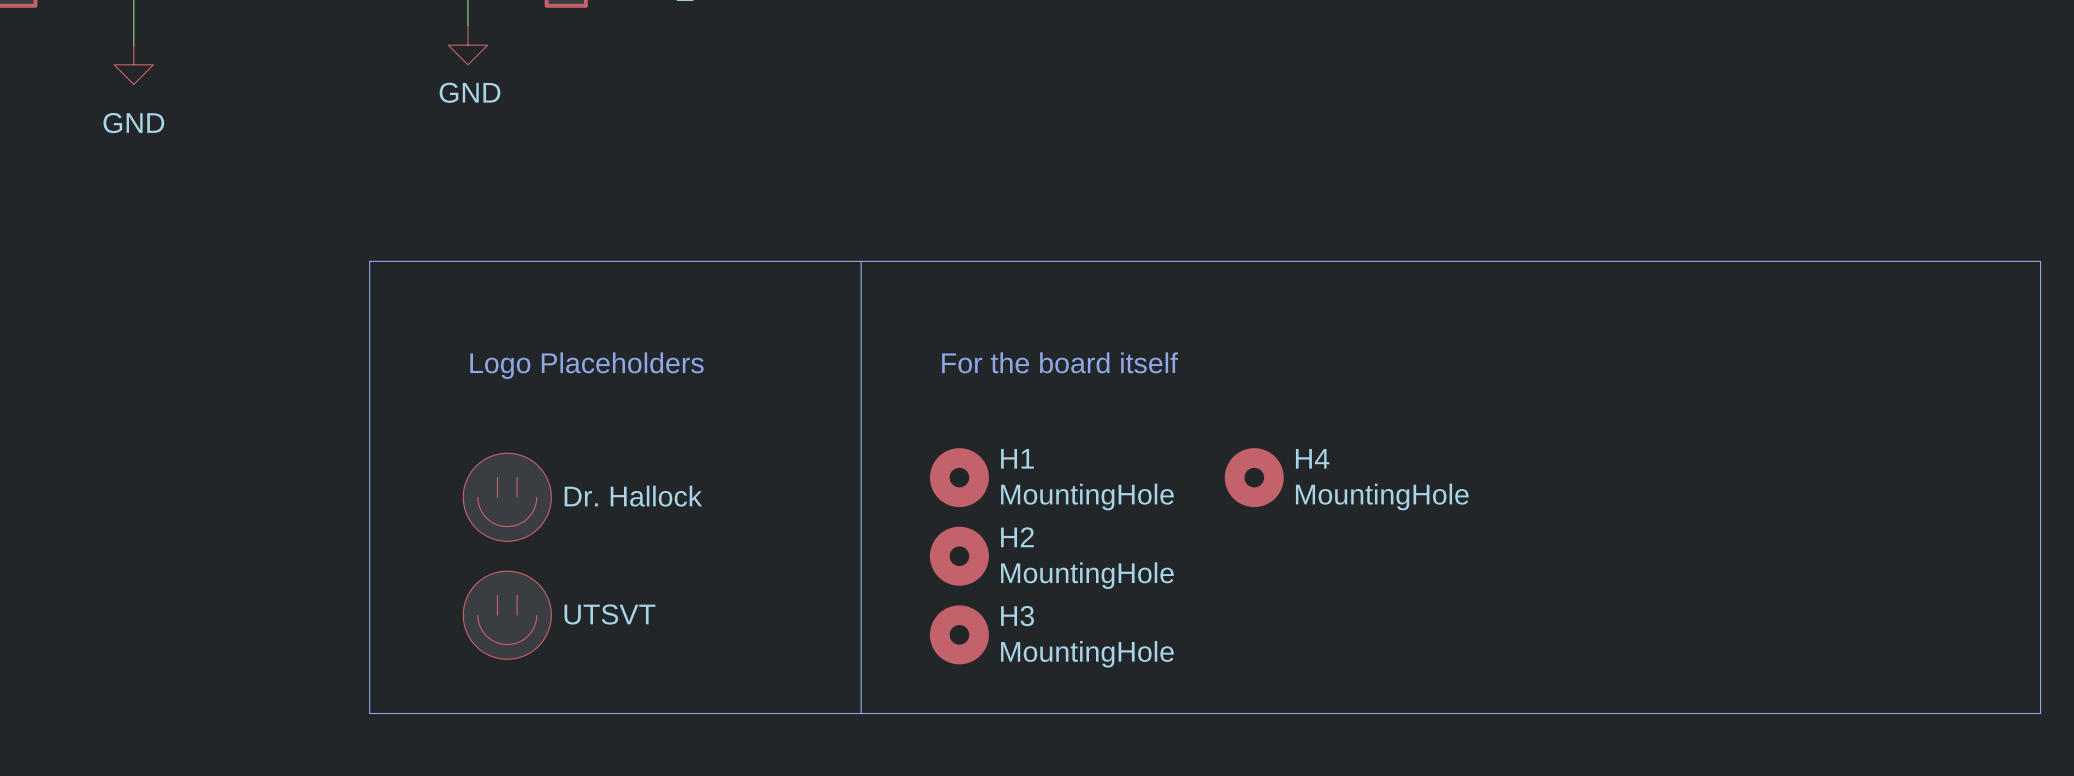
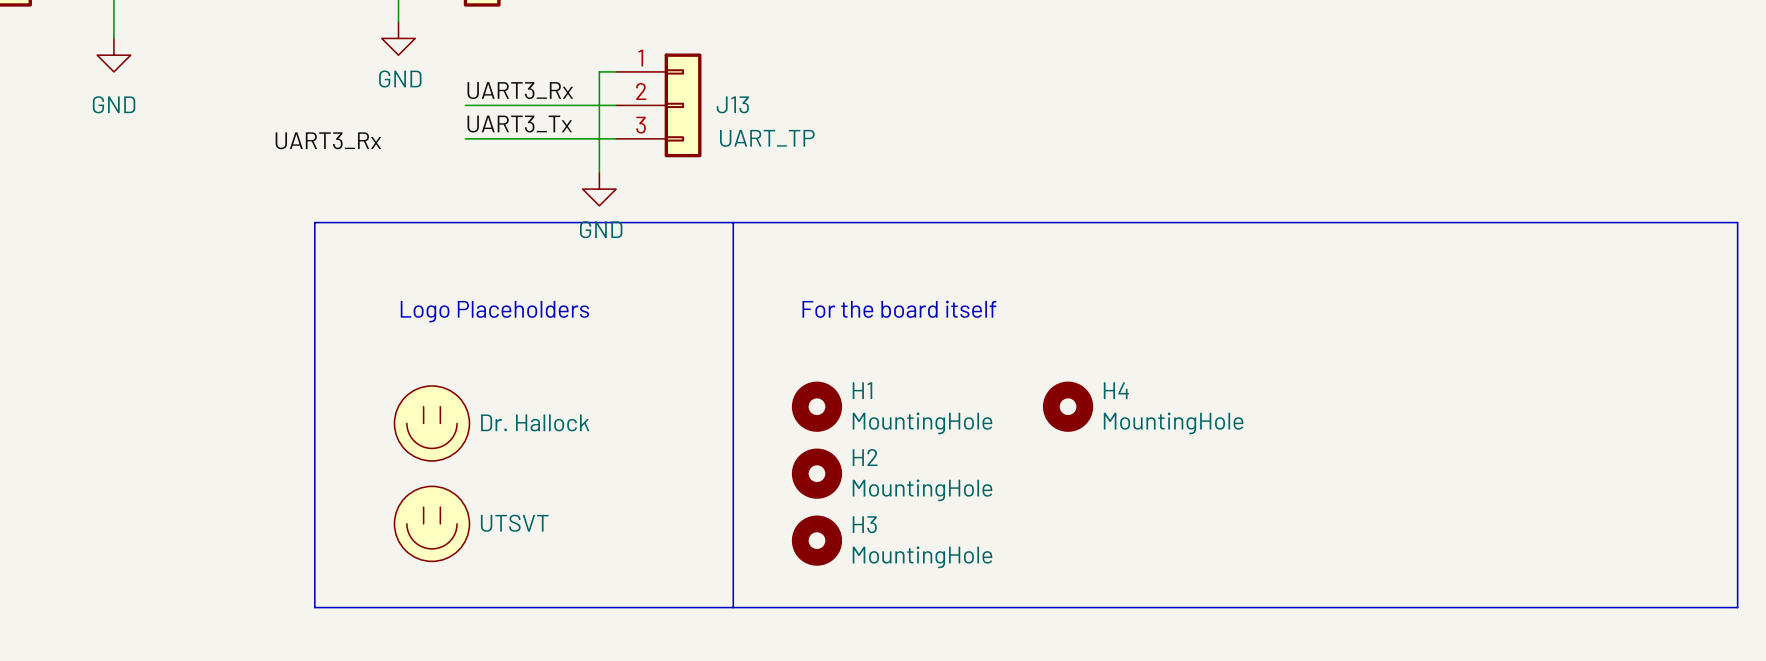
wire: none -> (616, 71) (599, 71) (599, 172)
label: none -> UART3_Rx (520, 90)
wire: none -> (465, 105) (616, 105)
J13: none -> UART_TP (658, 105)
label: none -> UART3_Tx (519, 124)
wire: none -> (465, 138) (616, 138)
label: none -> UART3_Rx (328, 140)
power symbol: none -> GND (599, 189)

